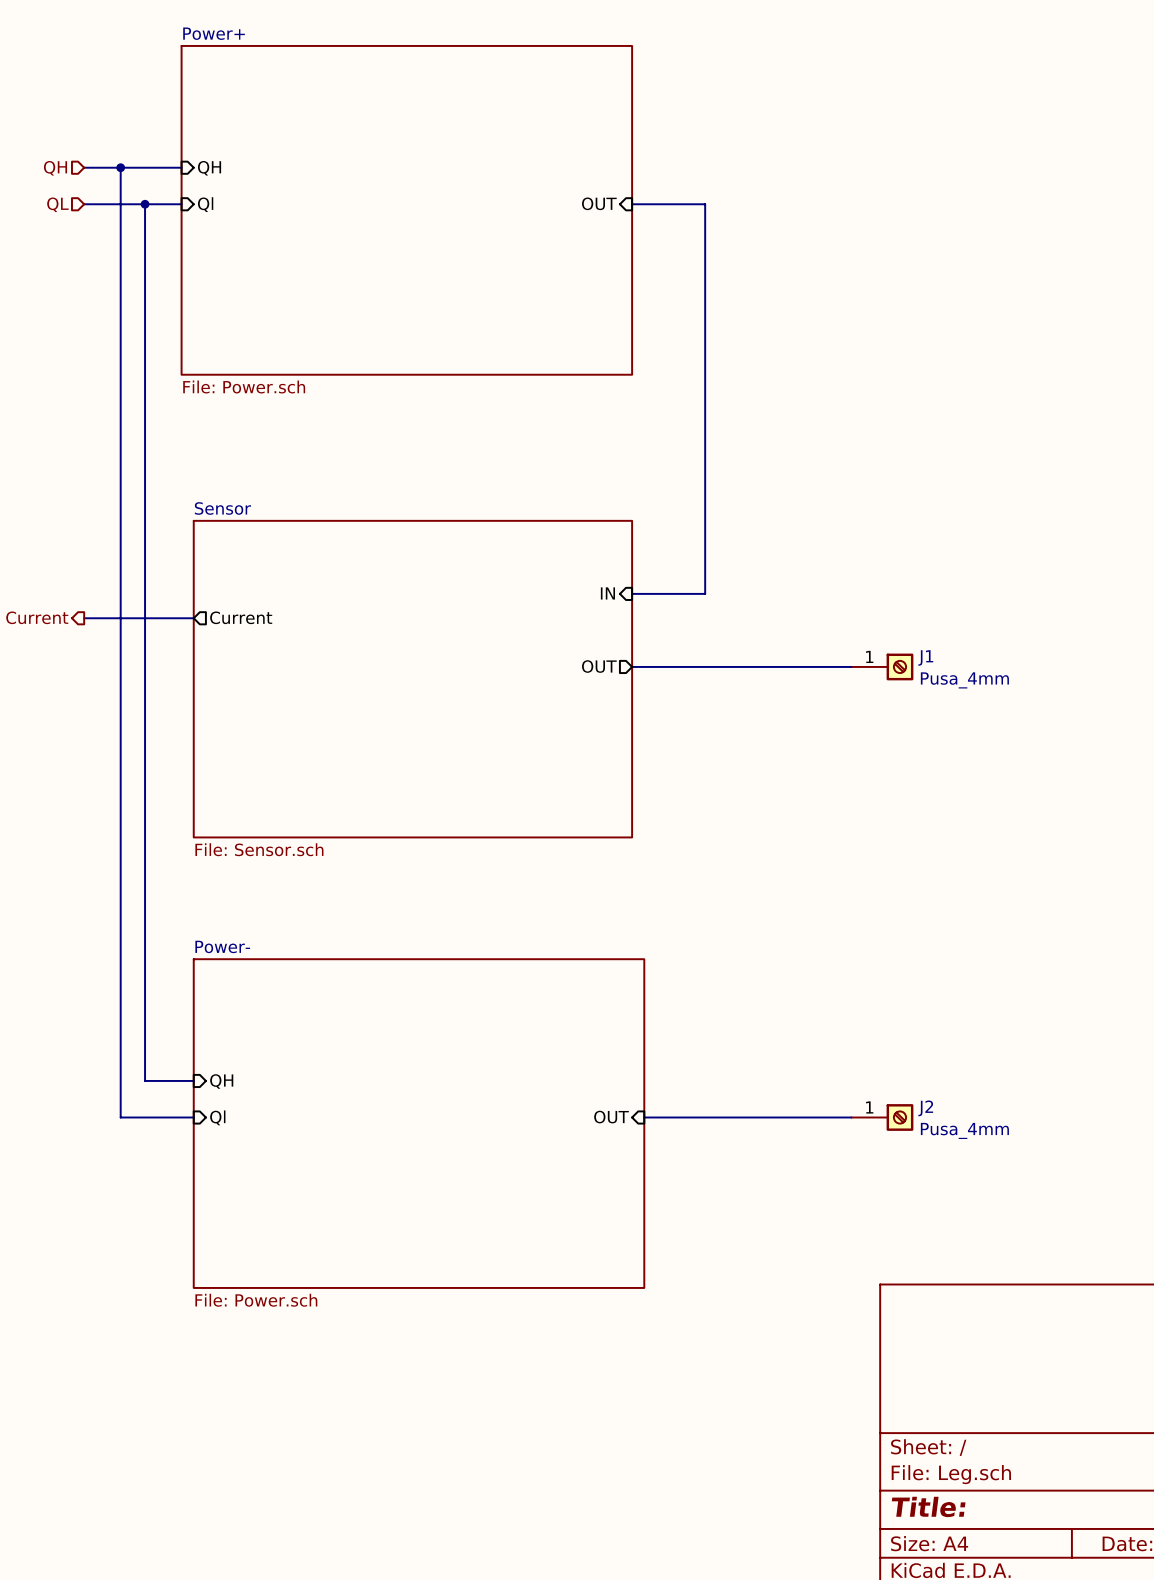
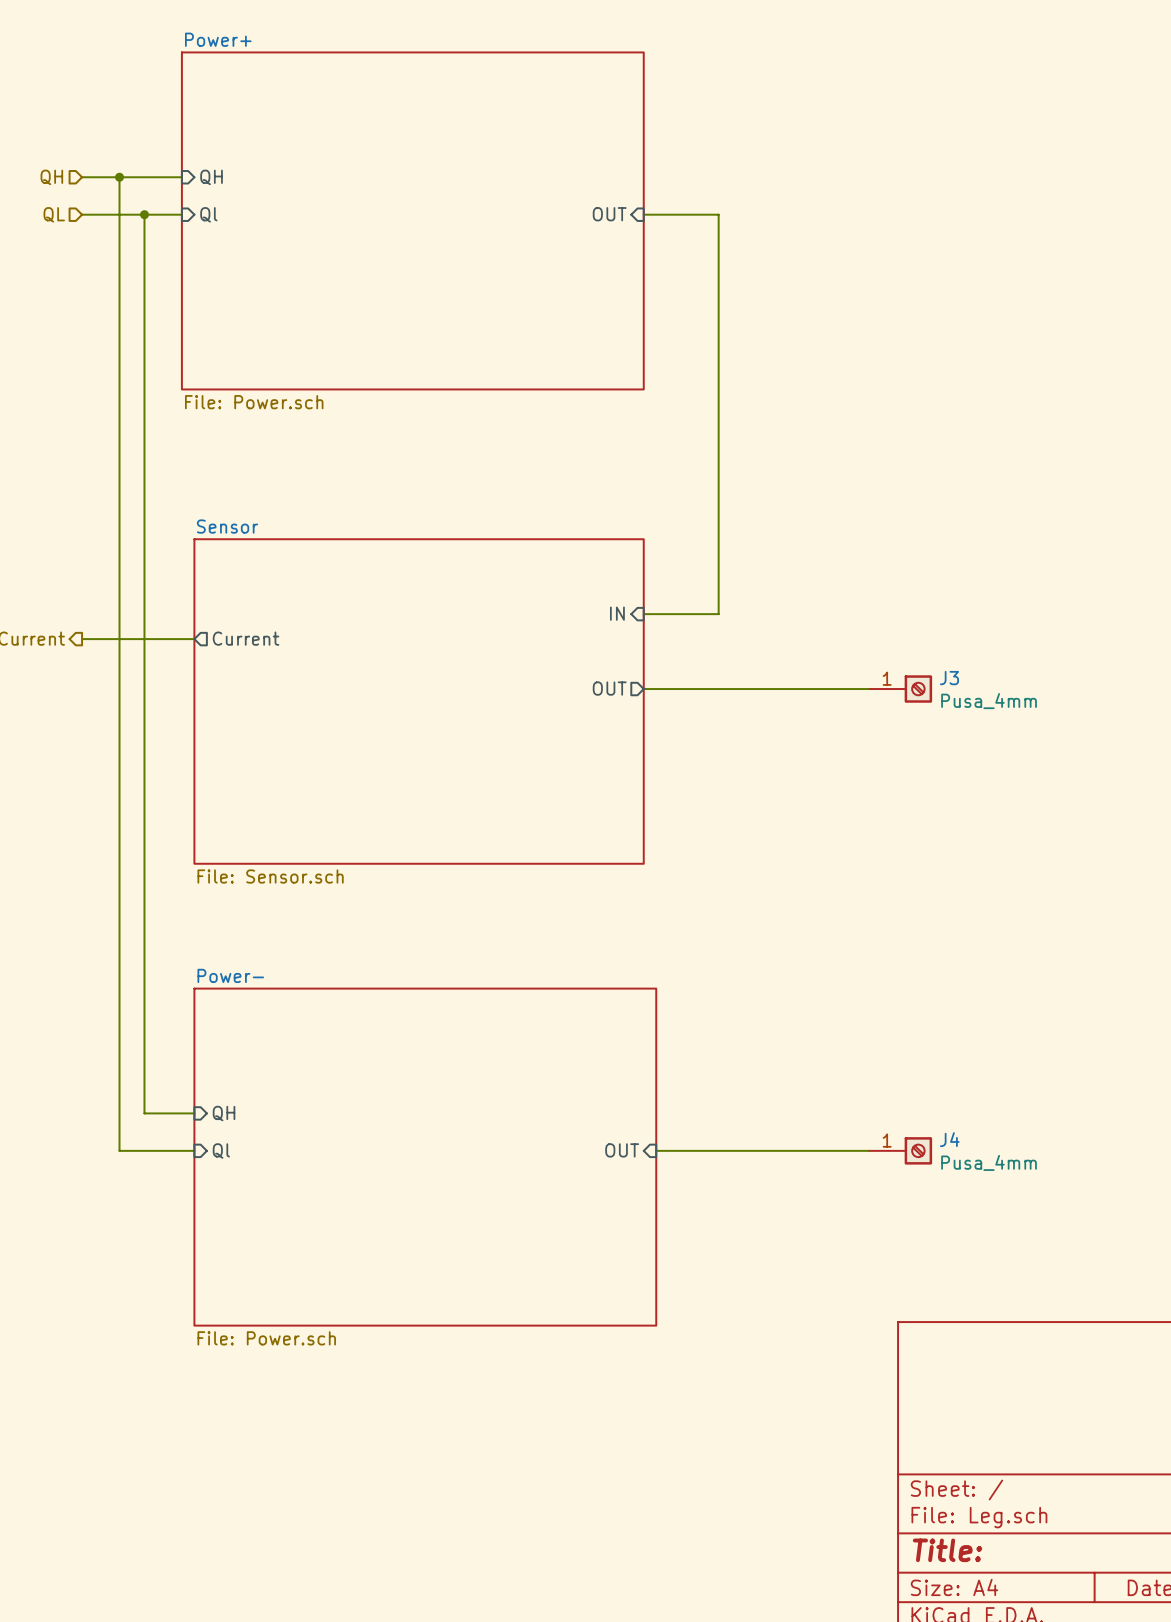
J1 name: J1 (925, 657) -> J3 (949, 678)
J2 name: J2 (925, 1108) -> J4 (949, 1139)

